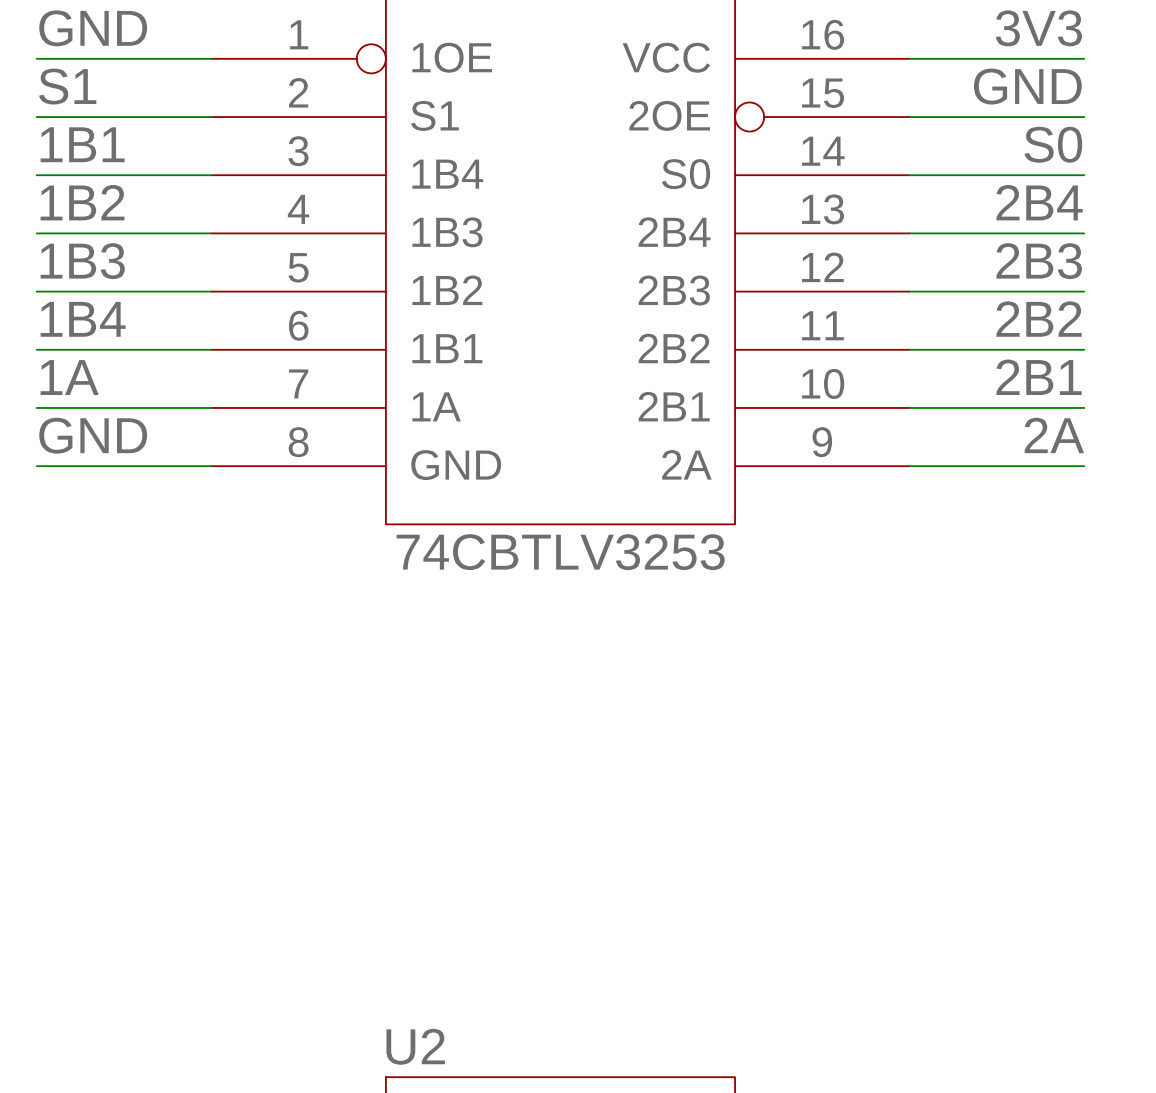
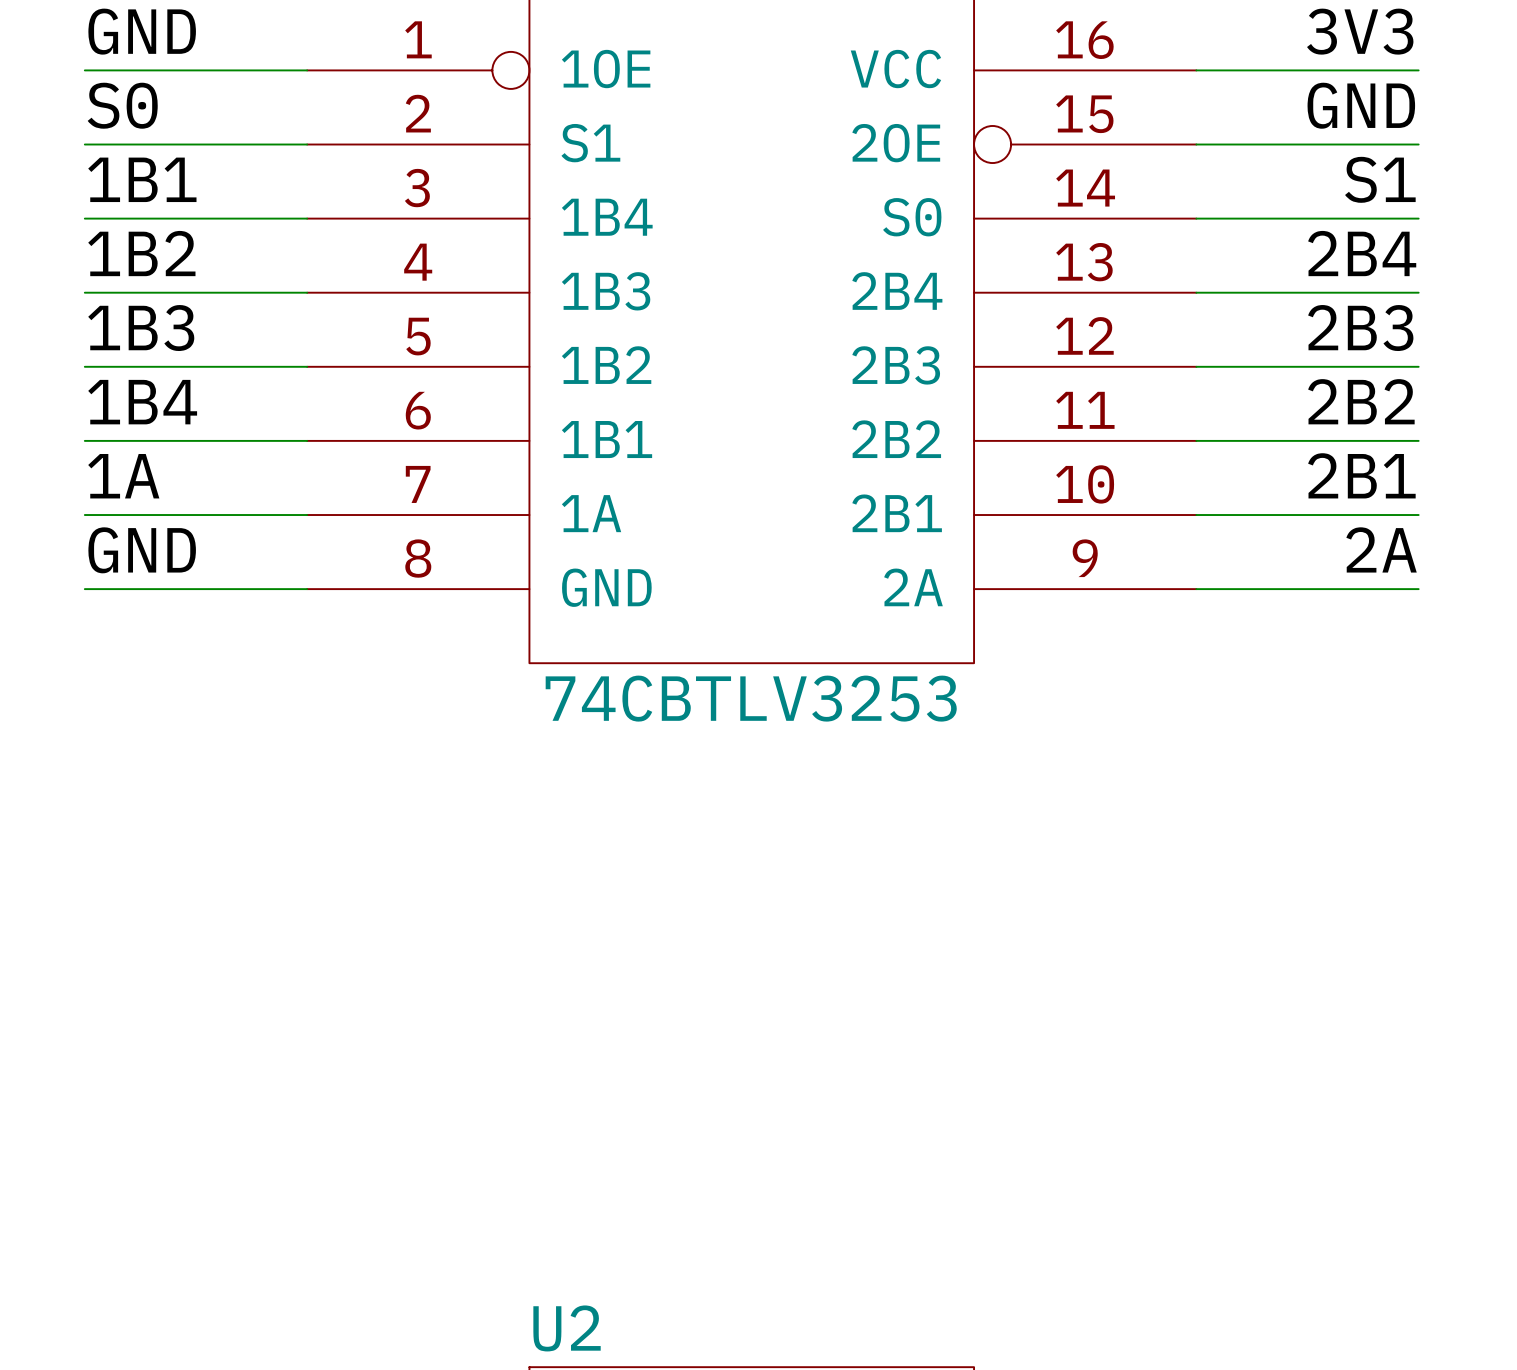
label: S1 (67, 86) -> S0 (122, 105)
label: S0 (1053, 144) -> S1 (1380, 179)

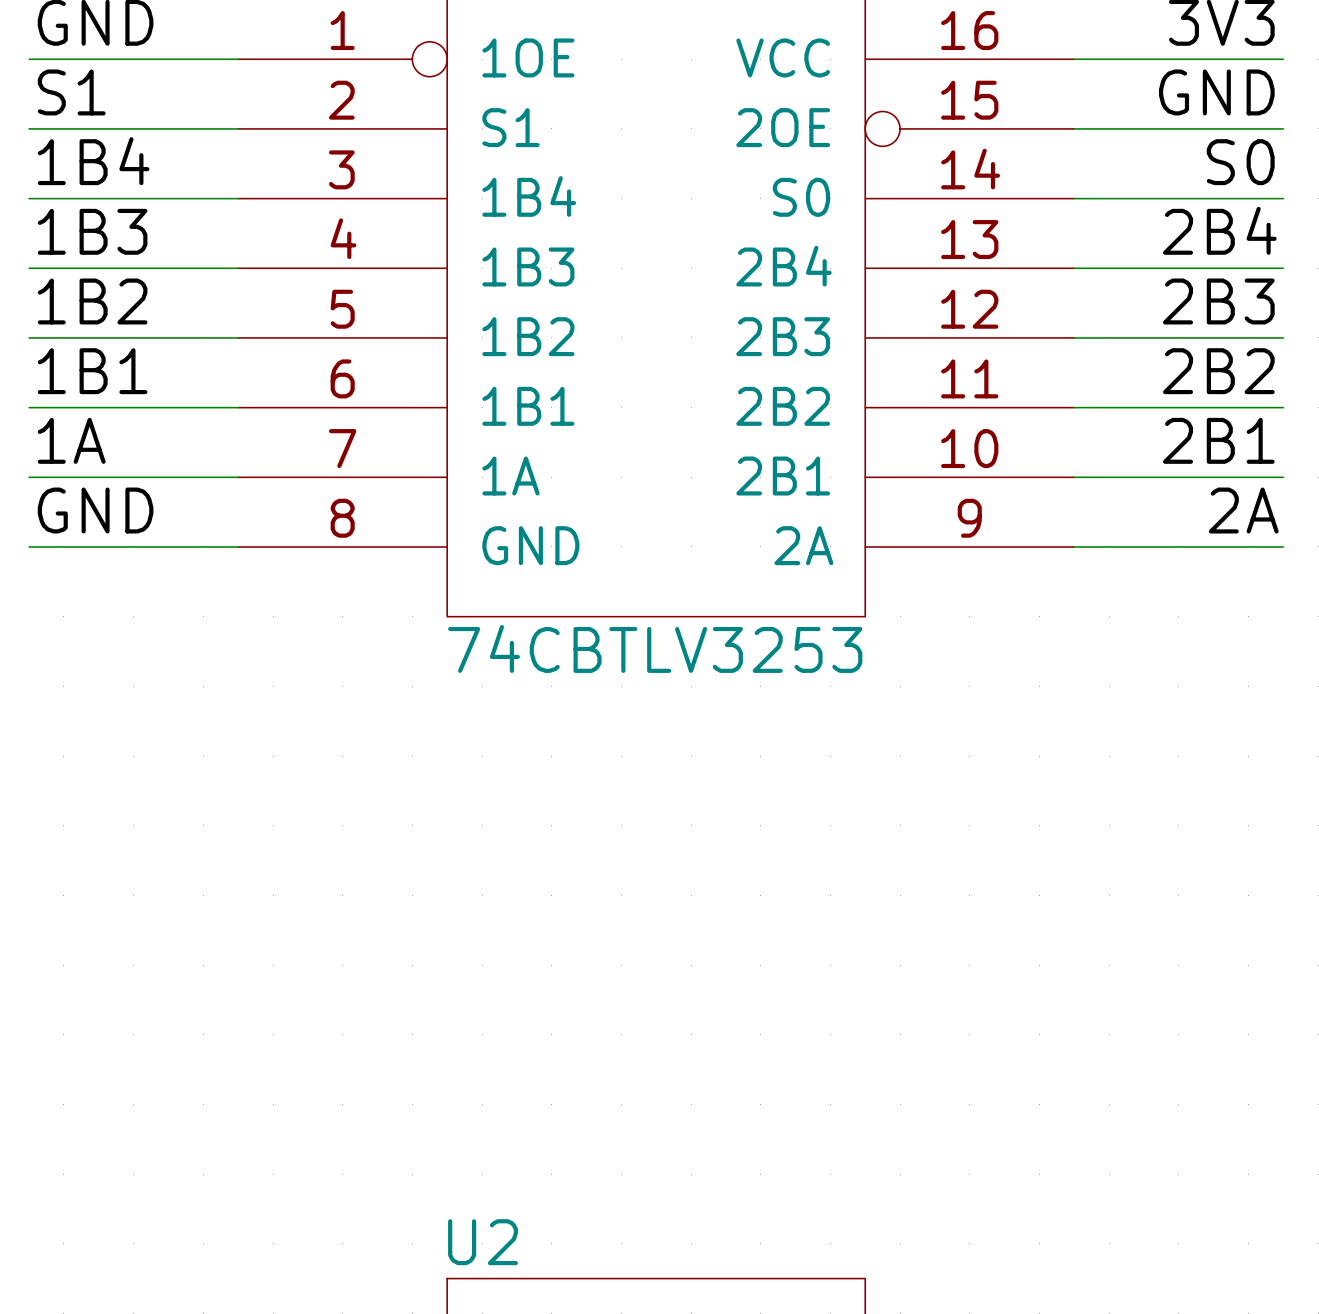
label: S0 (122, 105) -> S1 (71, 92)
label: 1B1 (142, 179) -> 1B4 (93, 161)
label: S1 (1380, 179) -> S0 (1240, 162)
label: 1B2 (141, 253) -> 1B3 (92, 231)
label: 1B3 (141, 328) -> 1B2 (92, 301)
label: 1B4 (142, 402) -> 1B1 (92, 371)

